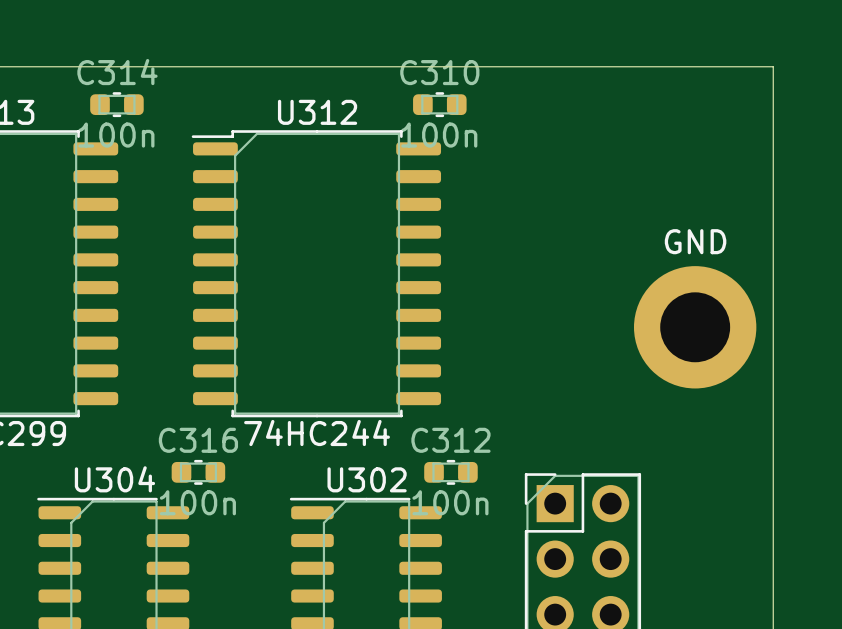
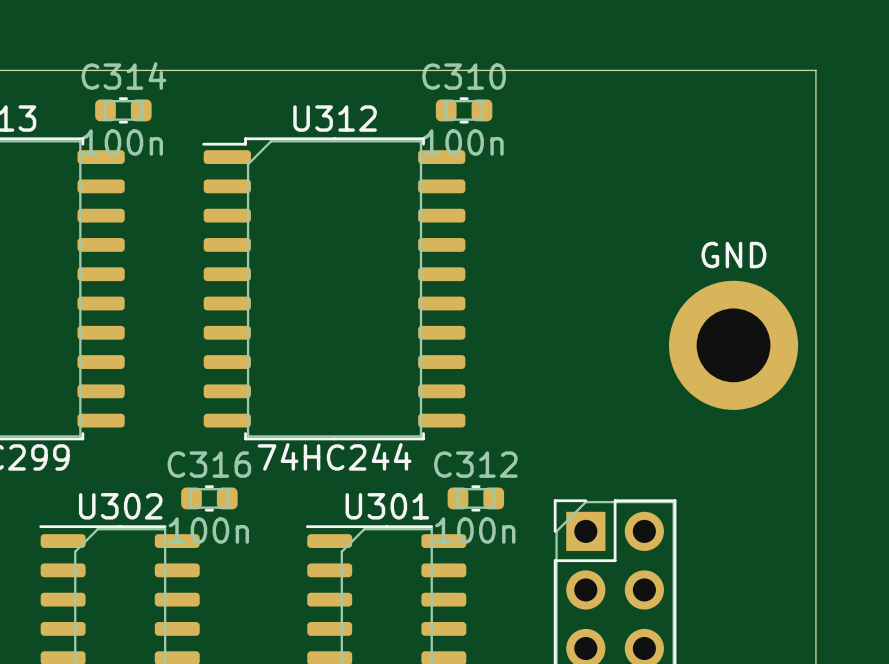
U304 name: U304 (114, 479) -> U302 (120, 506)
U302 name: U302 (367, 479) -> U301 (387, 506)

